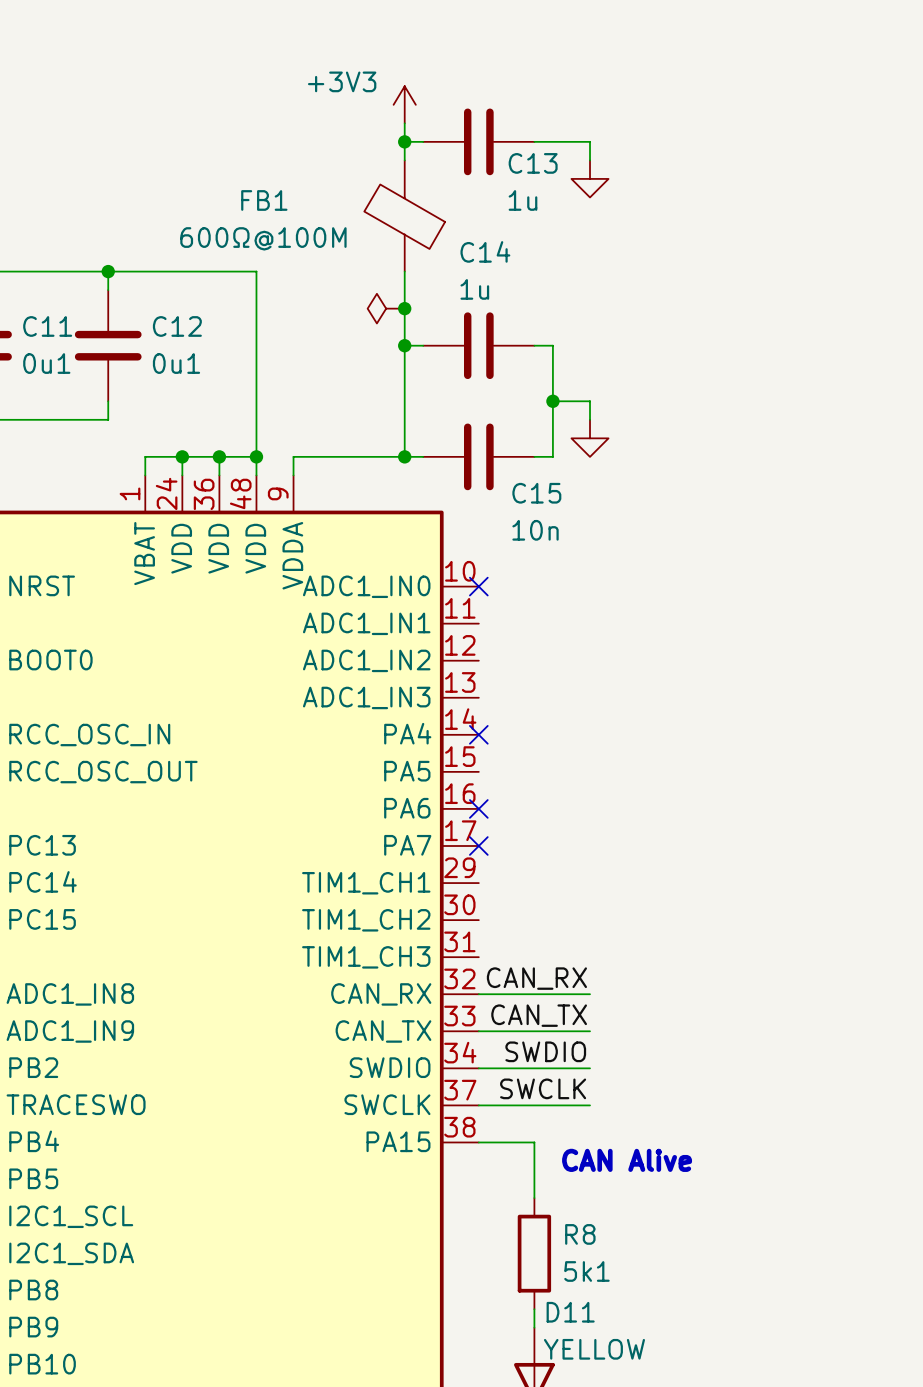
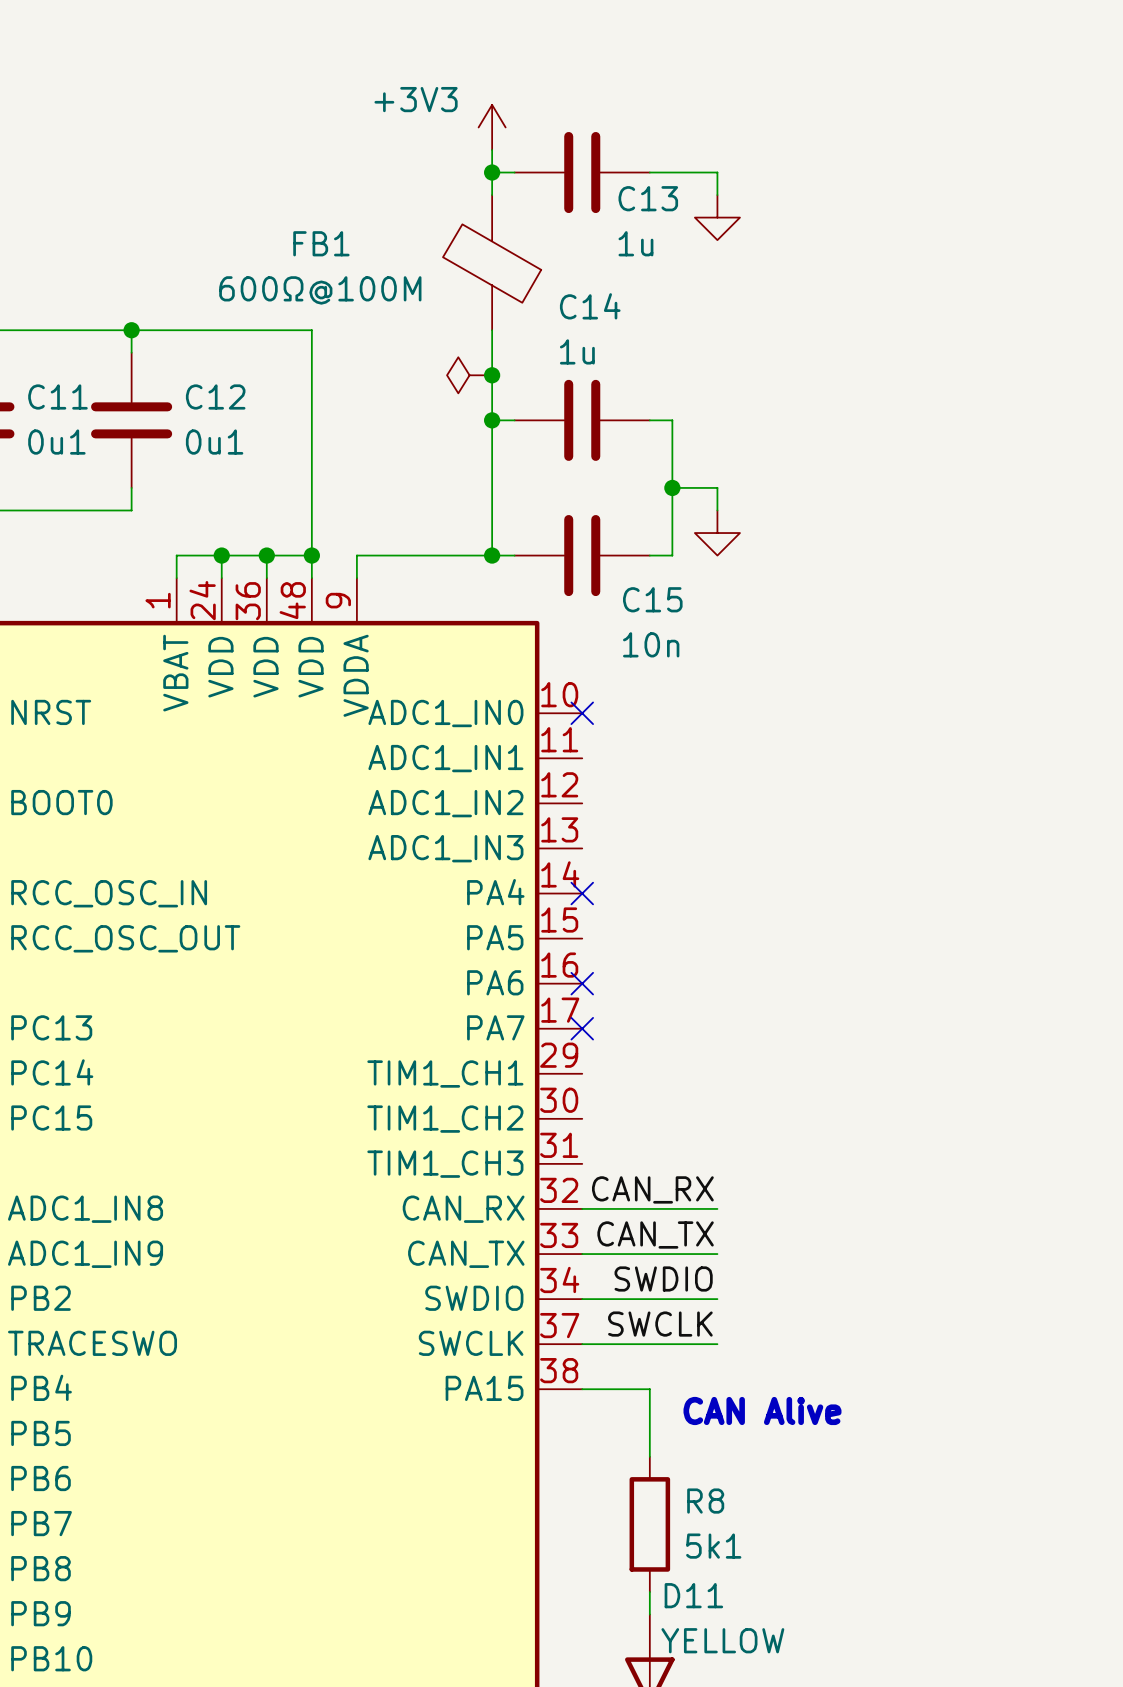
part pin name: I2C1_SCL (71, 1216) -> PB6 (41, 1478)
part pin name: I2C1_SDA (71, 1253) -> PB7 (41, 1523)

